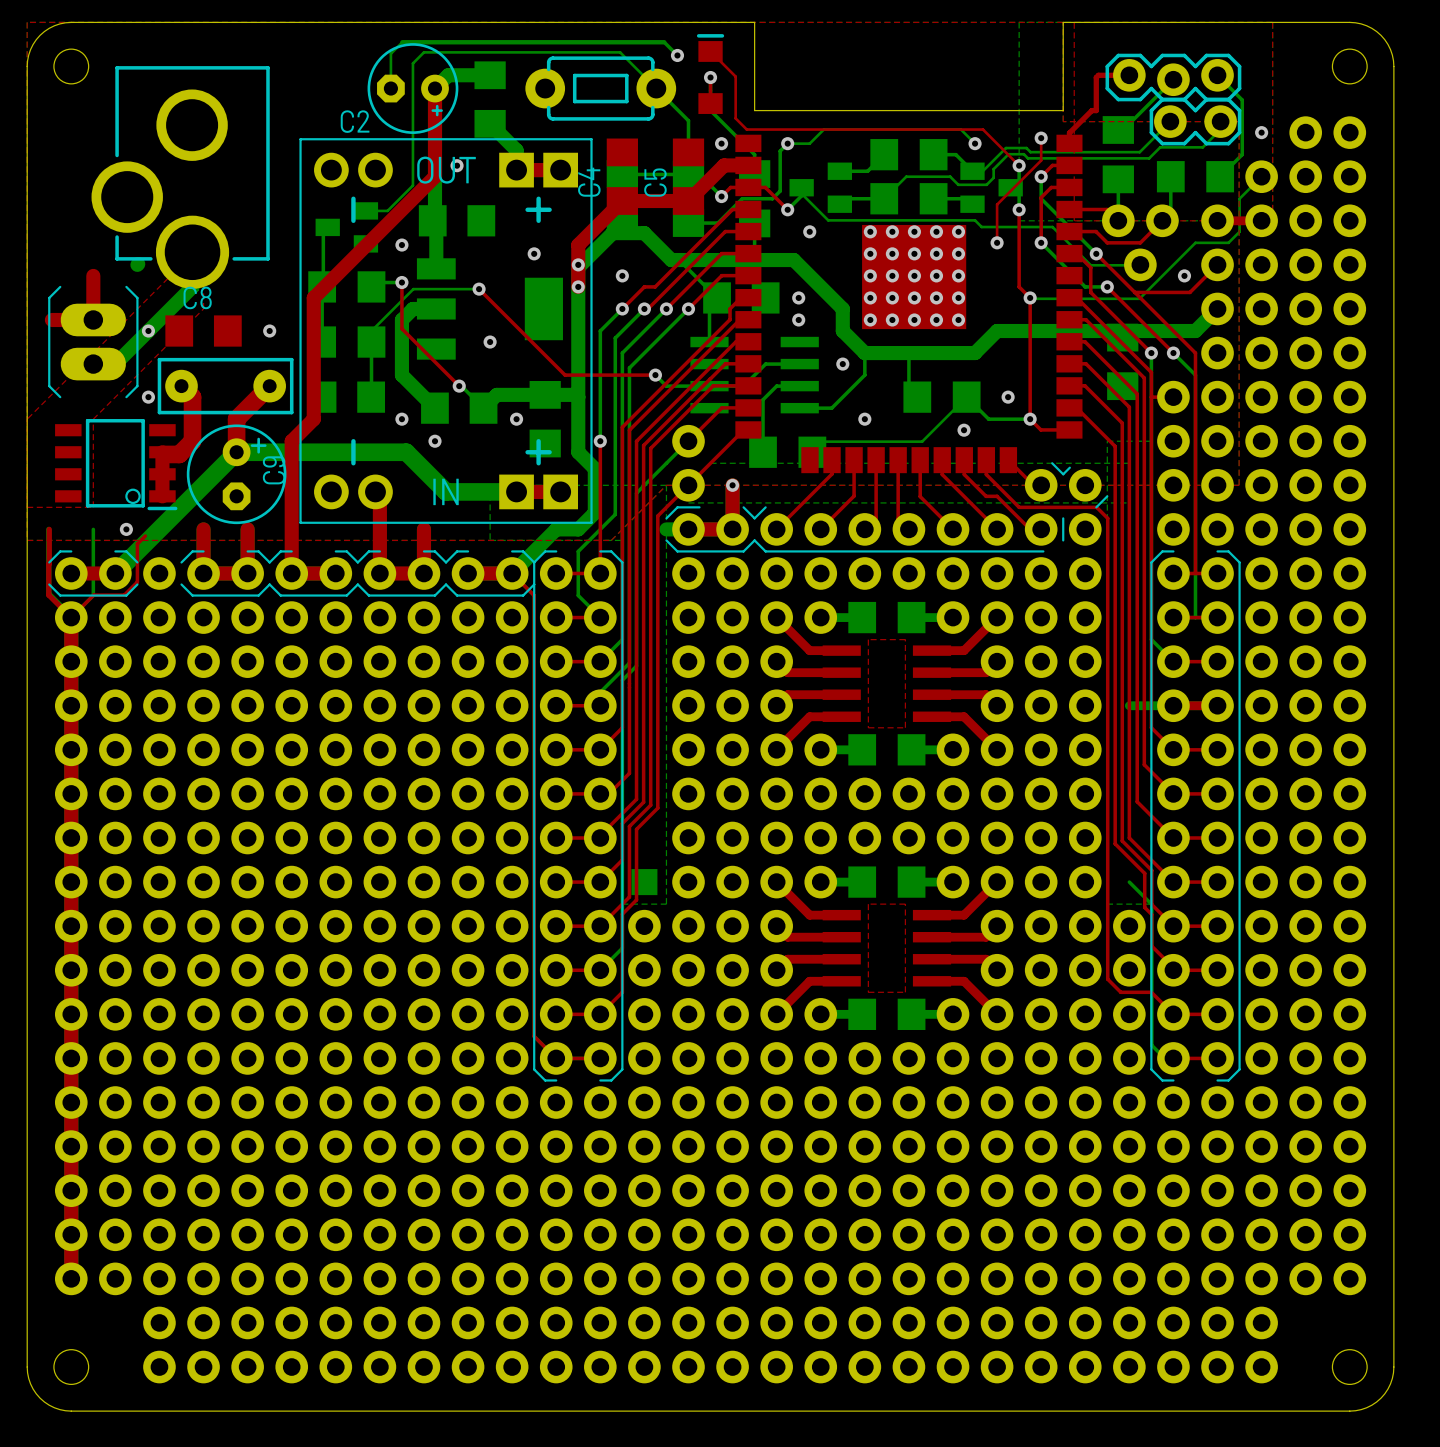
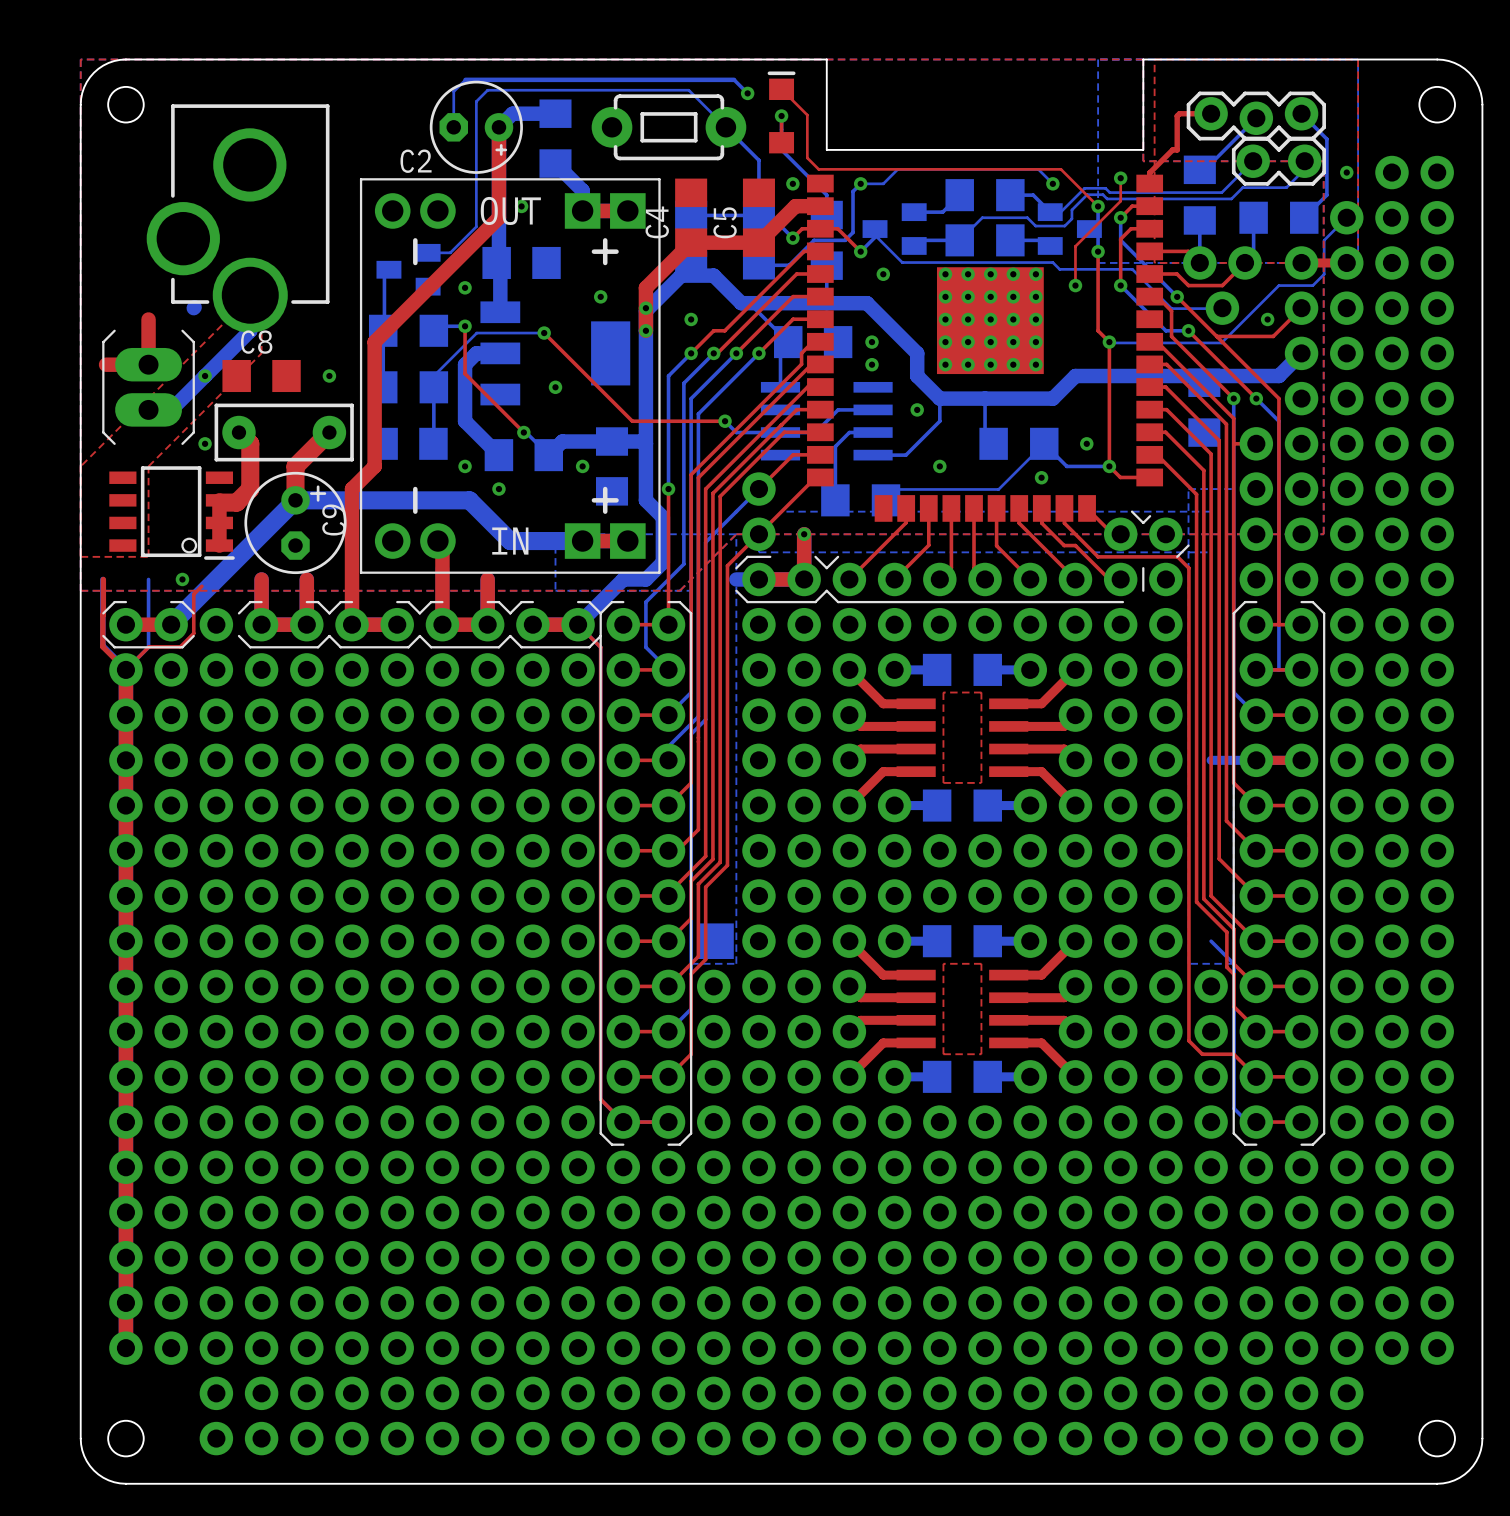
part footprint: [631, 869, 658, 896] -> [698, 923, 734, 960]

